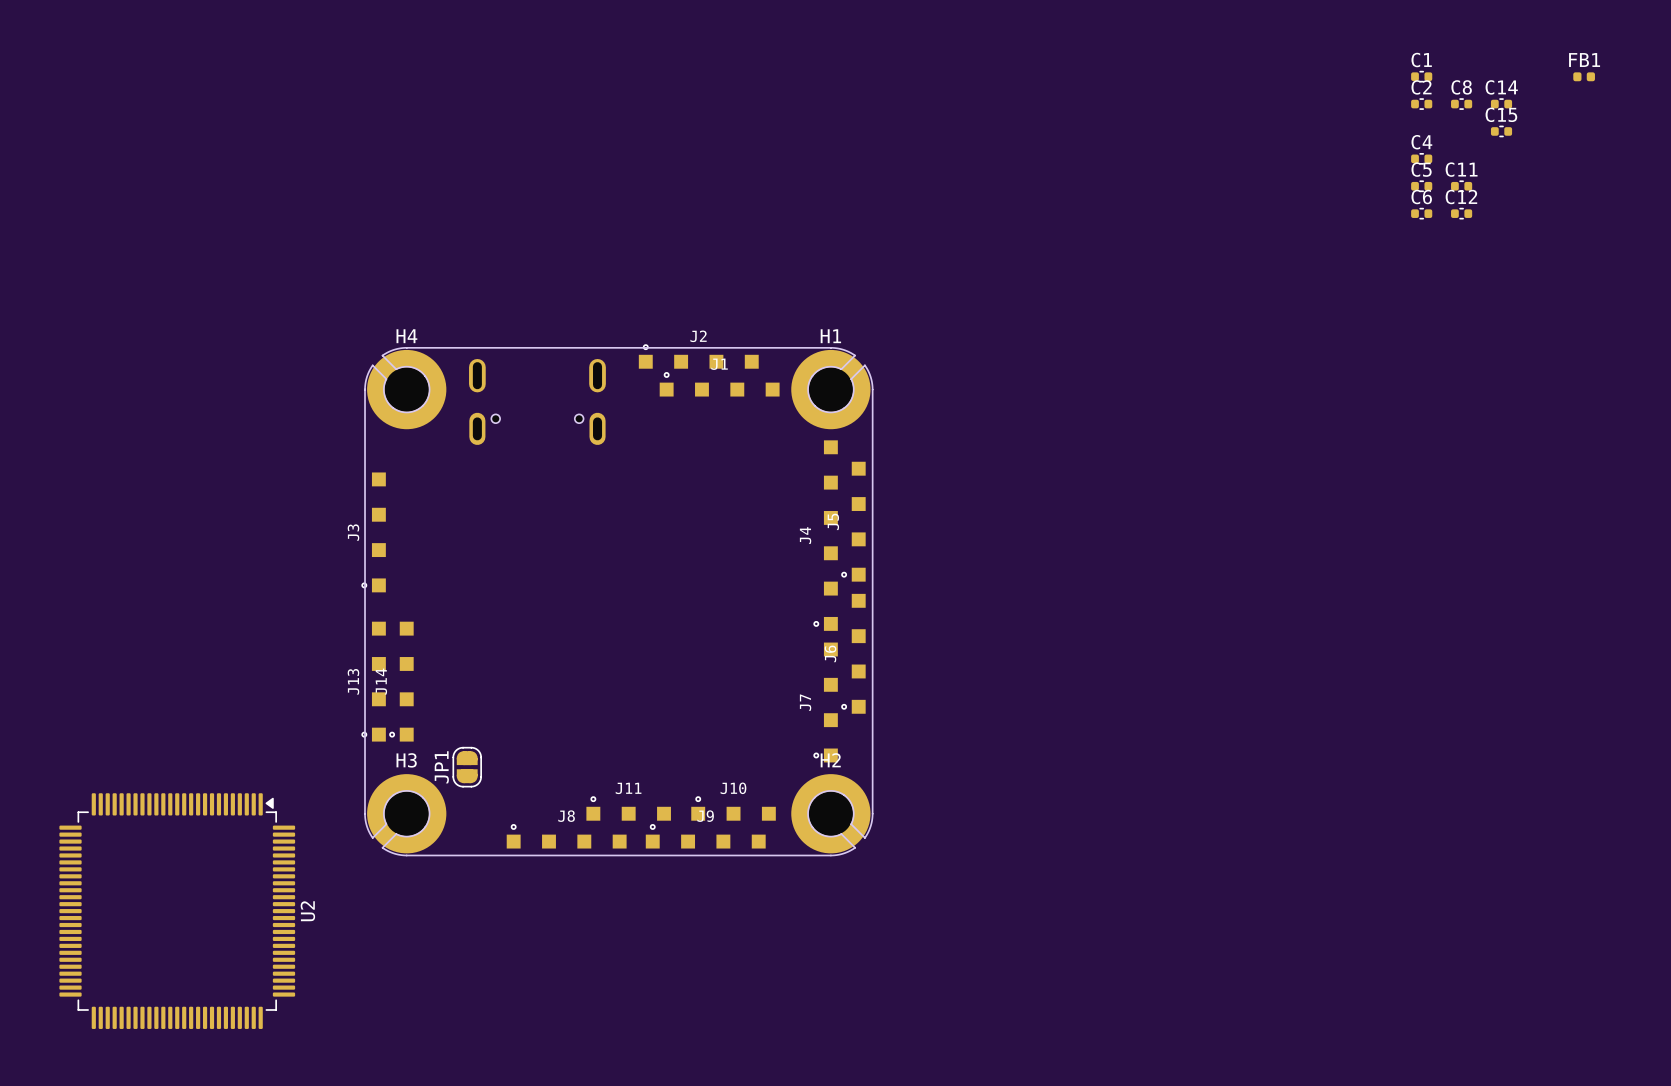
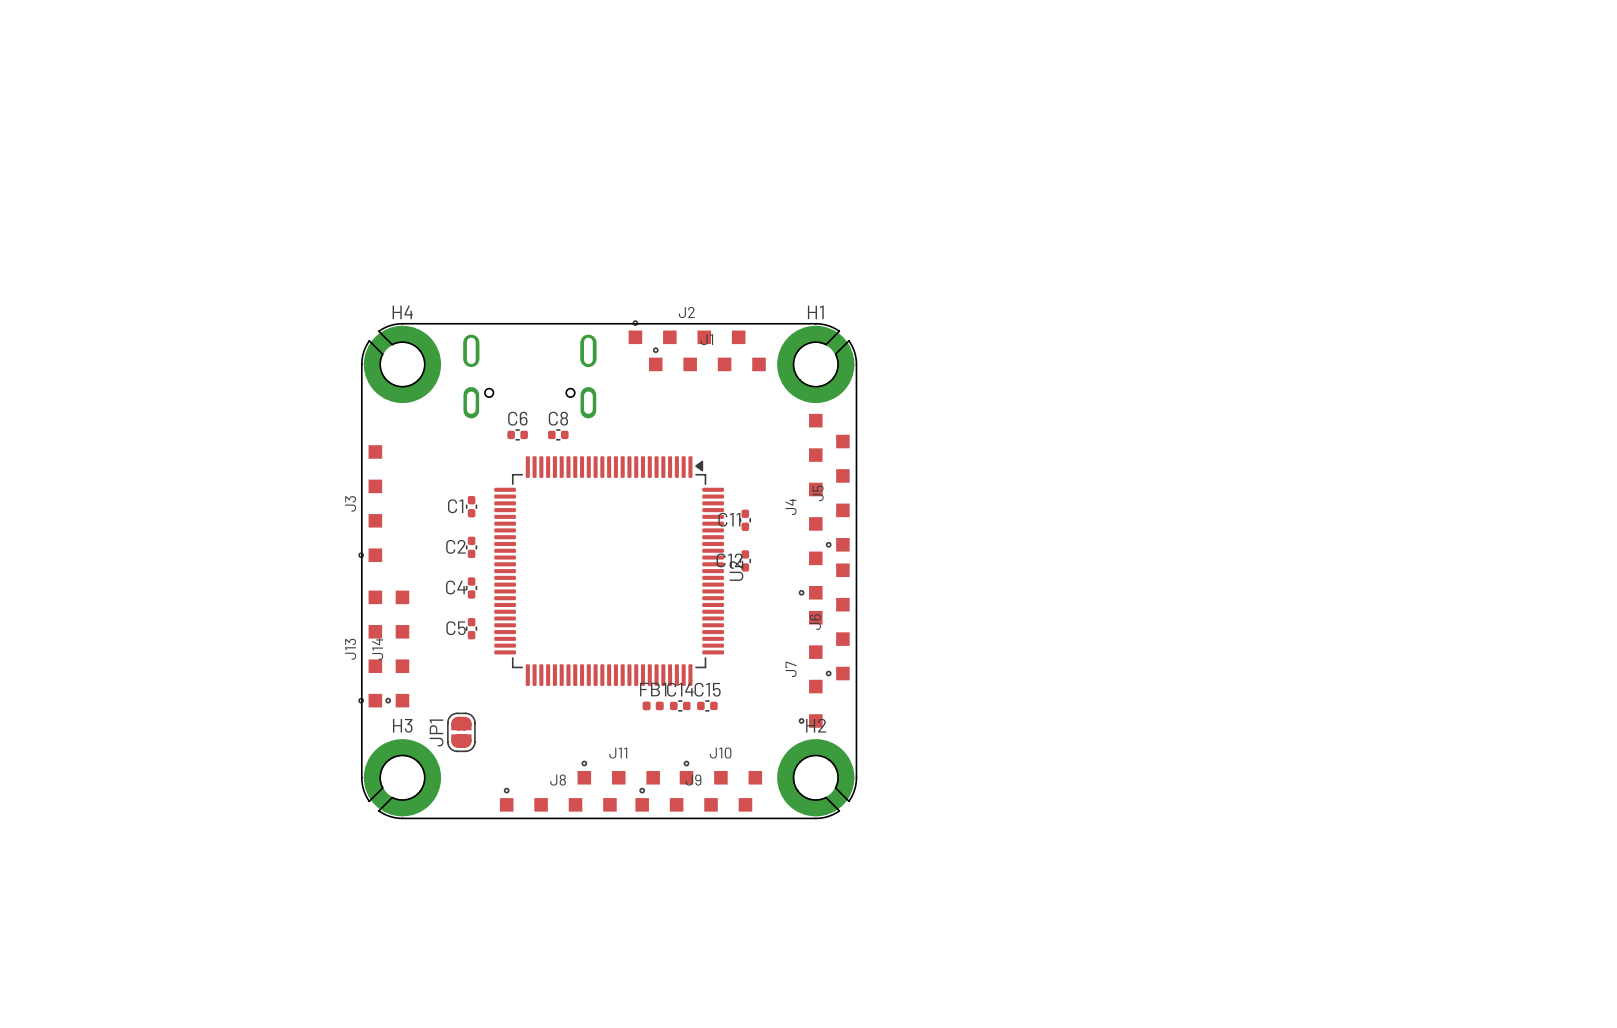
C1 footprint: [1411, 70, 1433, 83] -> [465, 496, 478, 518]
FB1 position: (1584, 76) -> (653, 705)
C2 footprint: [1411, 98, 1433, 110] -> [465, 536, 478, 559]
C8 position: (1461, 104) -> (558, 434)
C14 position: (1501, 104) -> (680, 705)
C15 position: (1501, 131) -> (707, 705)
C4 footprint: [1411, 153, 1433, 165] -> [465, 577, 478, 599]
C5 footprint: [1411, 180, 1433, 193] -> [465, 617, 478, 640]
C11 footprint: [1451, 180, 1473, 193] -> [739, 509, 752, 531]
C12 footprint: [1451, 207, 1473, 220] -> [739, 550, 752, 572]
C6 position: (1421, 213) -> (517, 434)
U2 position: (177, 911) -> (609, 571)

